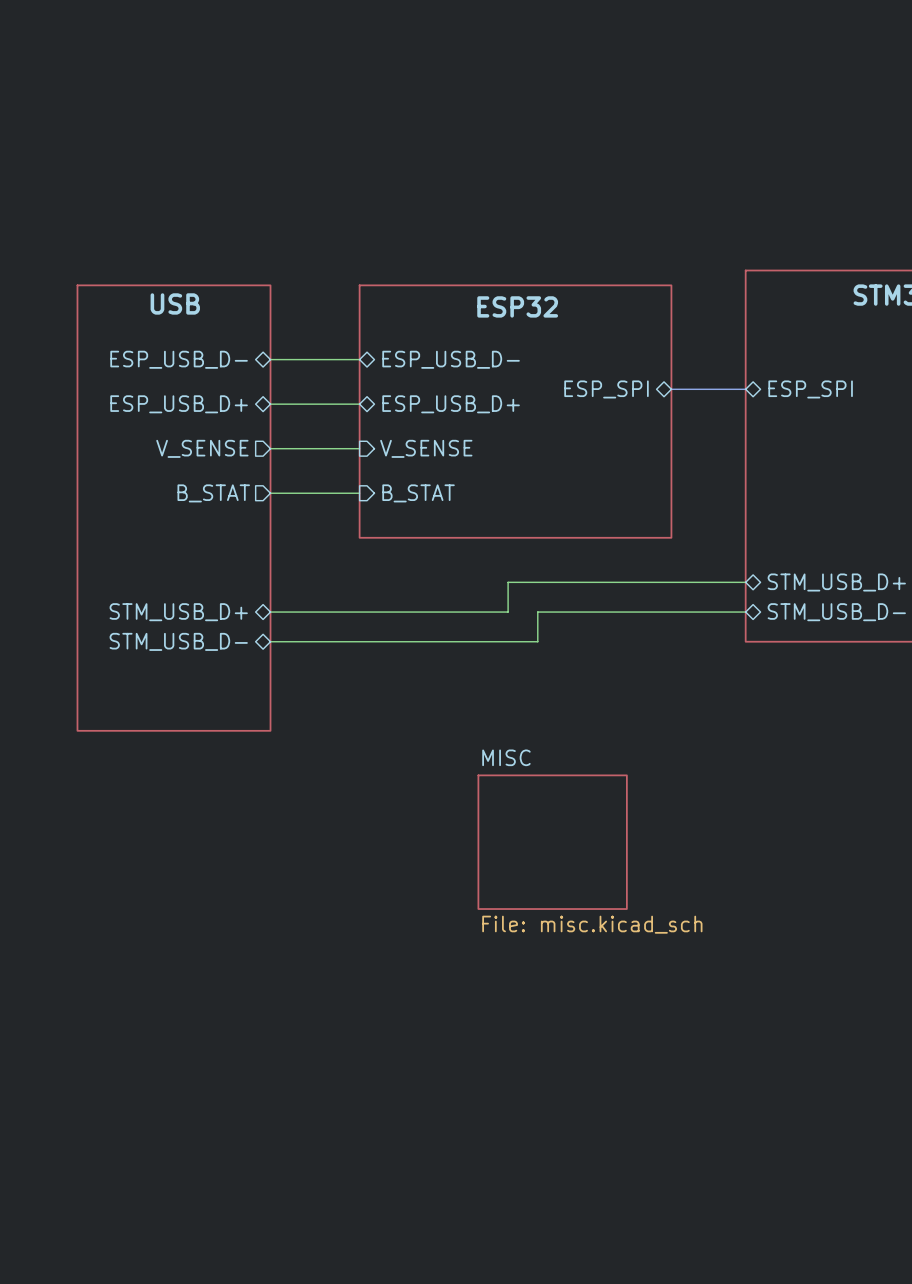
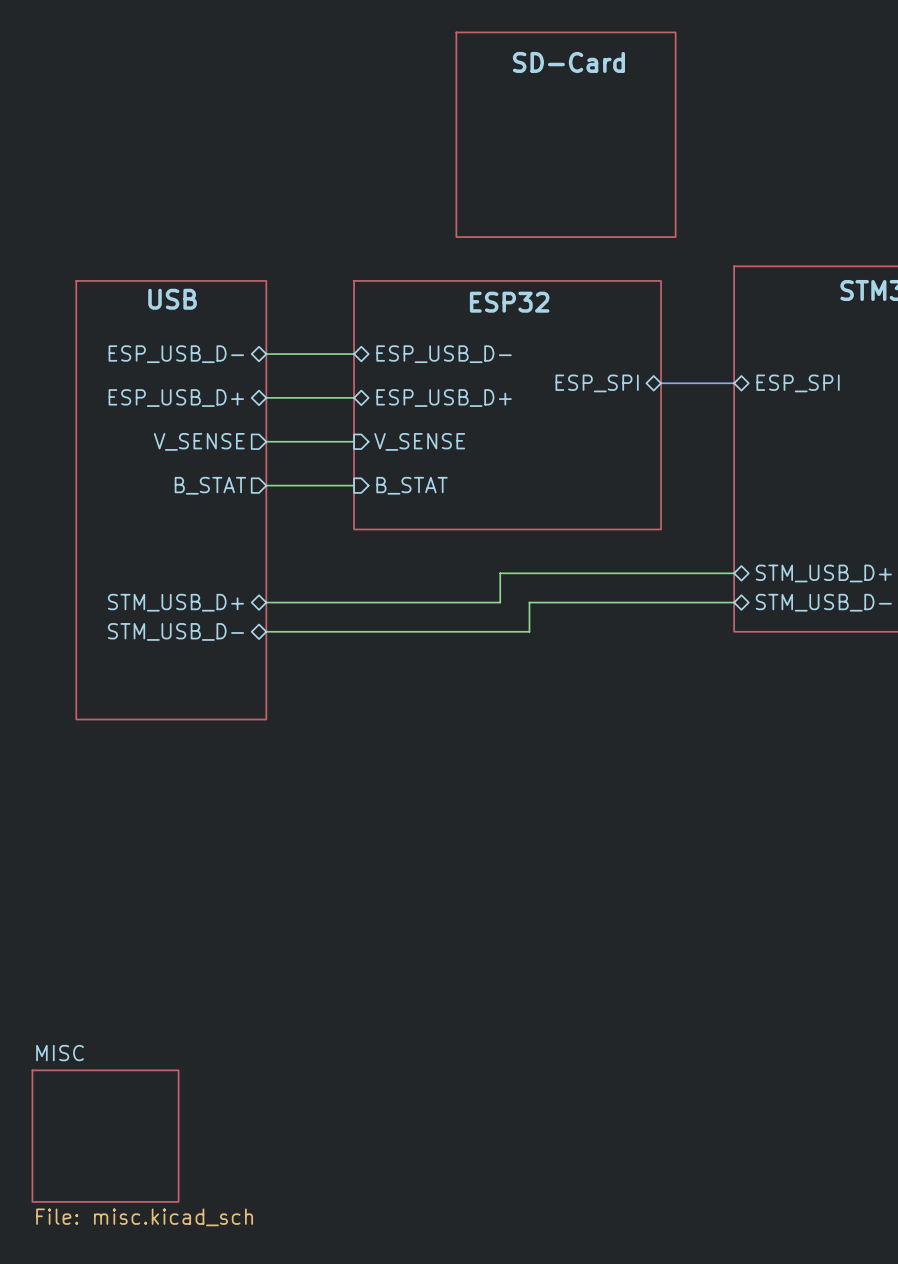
sheet SD-Card: none -> (566, 134)
sheet MISC: File: misc.kicad_sch (552, 842) -> none
sheet MISC: none -> File: misc.kicad_sch (105, 1136)

